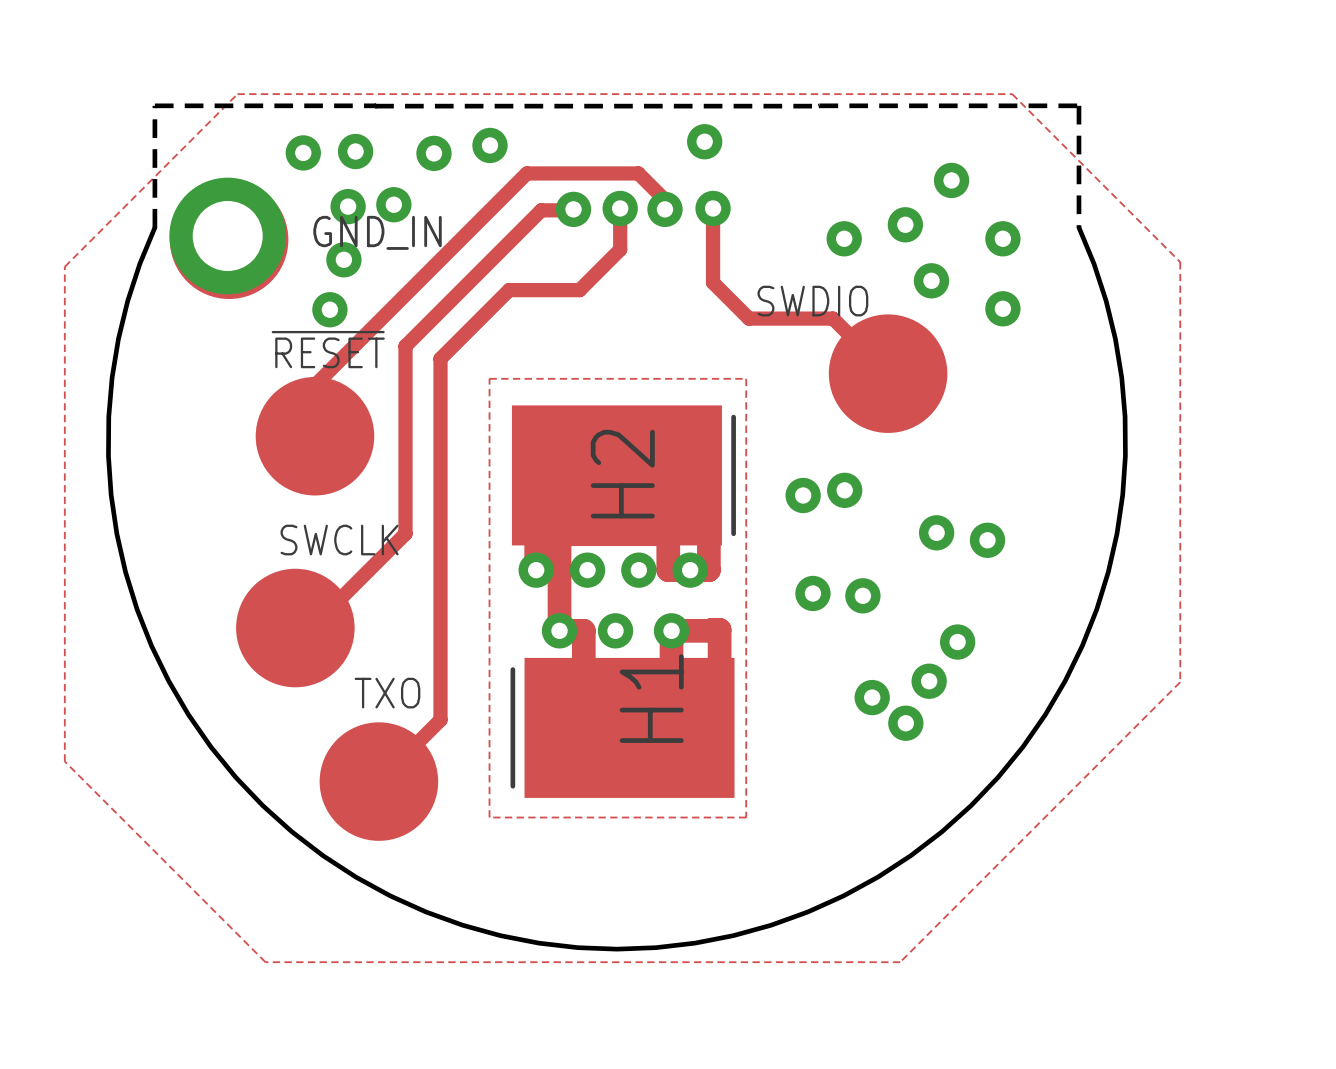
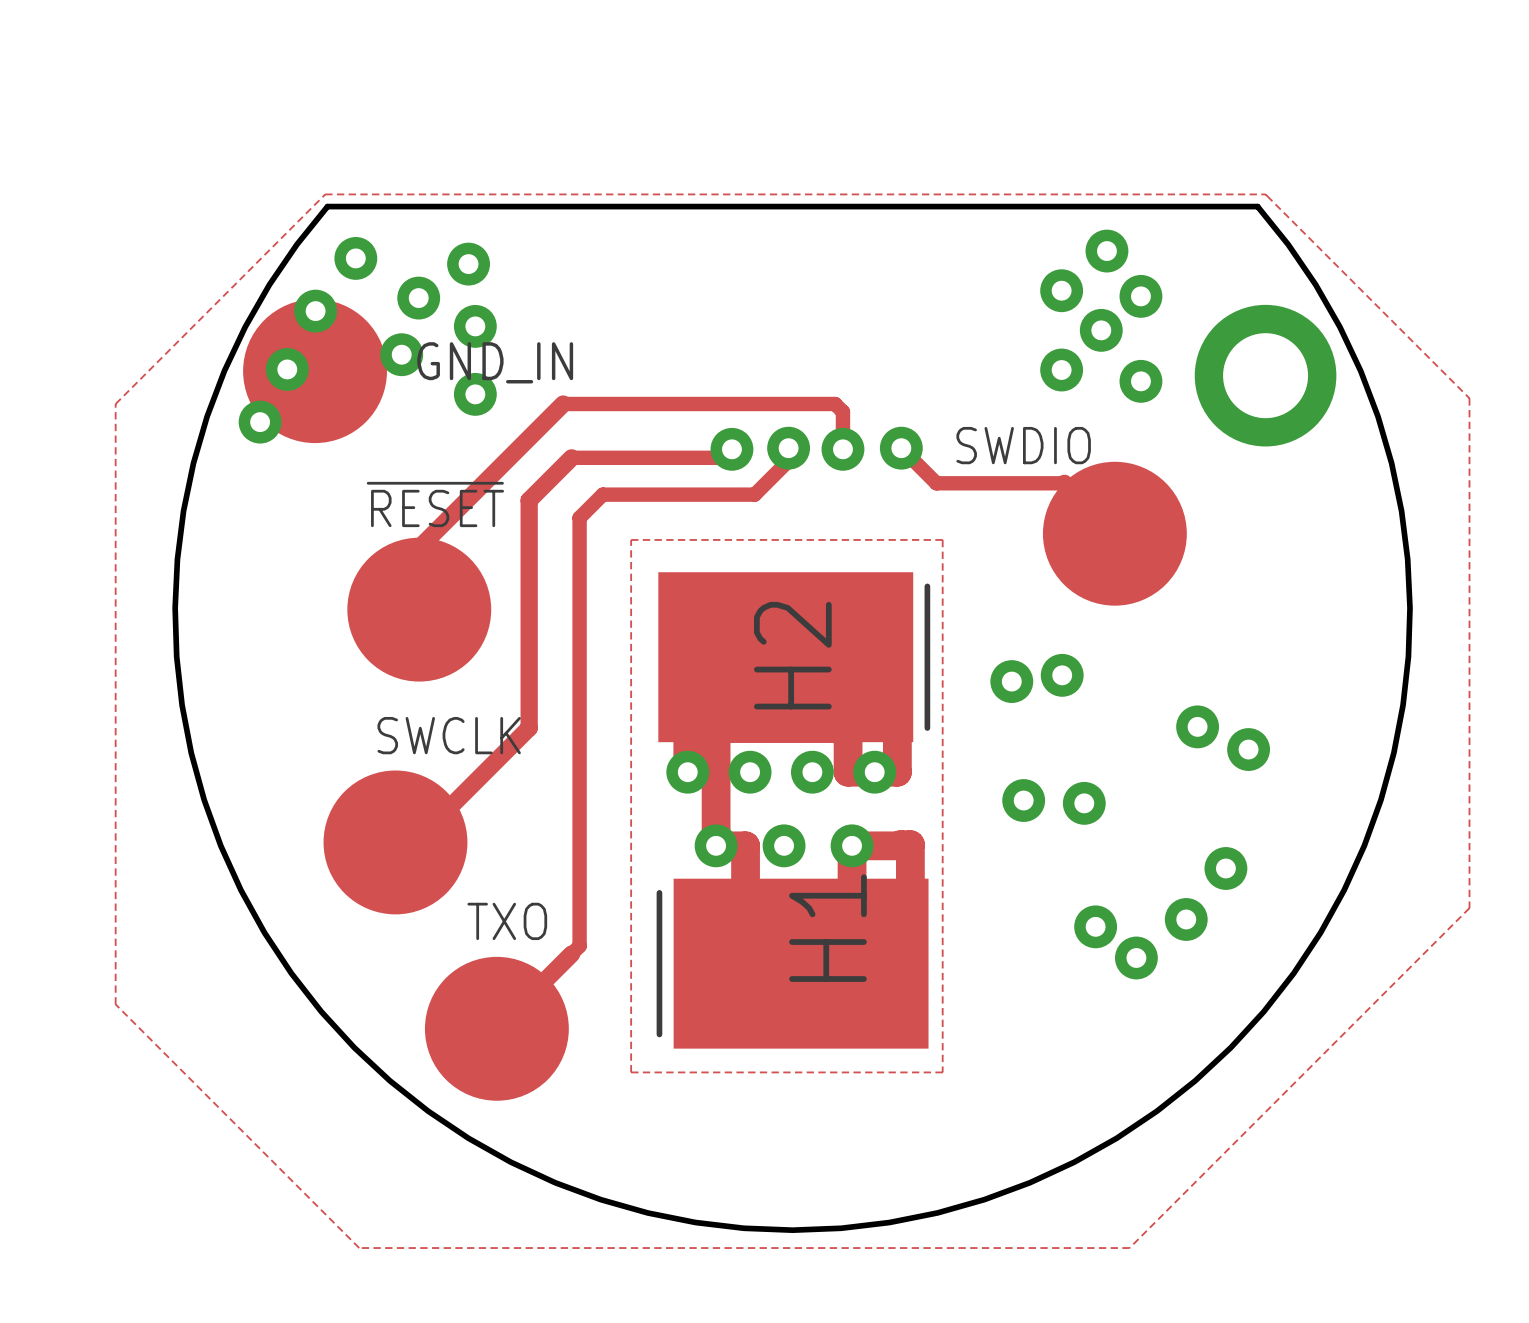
board edge: (154, 105) (1078, 105) (1078, 227) (1093, 263) (1106, 301) (1115, 339) (1121, 377) (1125, 416) (1125, 455) (1122, 494) (1117, 533) (1108, 571) (1096, 609) (1082, 645) (1065, 681) (1045, 714) (1022, 746) (998, 777) (971, 805) (941, 831) (910, 855) (878, 877) (843, 895) (808, 911) (771, 925) (733, 935) (694, 943) (656, 947) (616, 949) (577, 947) (538, 943) (500, 935) (462, 925) (425, 911) (390, 895) (355, 877) (322, 855) (291, 831) (262, 805) (235, 777) (210, 746) (188, 714) (168, 681) (151, 645) (137, 609) (125, 571) (116, 533) (111, 494) (108, 455) (108, 416) (112, 377) (118, 339) (127, 301) (139, 263) (154, 227) (154, 105) -> (327, 206) (296, 244) (269, 284) (245, 327) (224, 371) (207, 416) (193, 463) (183, 511) (177, 559) (175, 608) (176, 656) (182, 705) (191, 752) (204, 799) (220, 845) (240, 890) (264, 932) (291, 973) (321, 1011) (354, 1047) (389, 1080) (428, 1111) (468, 1138) (511, 1162) (555, 1182) (600, 1199) (647, 1212) (695, 1222) (743, 1228) (792, 1230) (841, 1228) (889, 1222) (937, 1212) (984, 1199) (1029, 1182) (1074, 1162) (1116, 1138) (1157, 1111) (1195, 1080) (1230, 1047) (1263, 1011) (1293, 973) (1320, 932) (1344, 890) (1364, 845) (1380, 799) (1393, 752) (1403, 705) (1408, 656) (1409, 608) (1407, 559) (1401, 511) (1391, 463) (1378, 416) (1360, 371) (1339, 327) (1315, 284) (1288, 244) (1257, 206) (327, 206)
via: none -> (1106, 251)
via: (704, 141) -> none
via: (489, 145) -> none
via: none -> (355, 258)
via position: (303, 152) -> (418, 298)
via: (433, 153) -> none
via: none -> (1061, 290)
via size: [169, 177, 287, 295] -> [265, 348, 309, 391]
via: none -> (1140, 296)
via: (951, 180) -> none
via: none -> (315, 311)
via: (393, 204) -> none
via position: (348, 206) -> (475, 326)
via: none -> (1101, 330)
track: (620, 208) (620, 249) (579, 290) (509, 290) (440, 358) (440, 719) -> (788, 448) (788, 460) (754, 494) (602, 494) (579, 517) (579, 946) (571, 954)
via: (620, 208) -> none
track: (713, 208) (713, 282) (749, 318) (833, 318) (846, 332) -> (901, 448) (936, 483) (1064, 483)
via: (713, 208) -> none
track: (573, 209) (541, 210) (440, 311) -> (731, 449) (723, 457) (571, 457)
via: (573, 209) -> none
track: (664, 209) (664, 200) (638, 173) (526, 173) (433, 266) -> (842, 449) (842, 411) (835, 404) (563, 404)
via: (664, 209) -> none
via size: [985, 221, 1021, 257] -> [1194, 304, 1337, 447]
via: (905, 224) -> none
via: none -> (401, 354)
via: none -> (1140, 381)
via position: (343, 259) -> (475, 394)
via: (931, 280) -> none
via: none -> (260, 422)
via: none -> (788, 448)
via: none -> (901, 448)
via: none -> (731, 449)
via: none -> (842, 449)
via: (1002, 308) -> none
via: (329, 309) -> none
via position: (936, 532) -> (1197, 726)
via position: (987, 540) -> (1248, 749)
via position: (957, 642) -> (1225, 868)
via position: (929, 681) -> (1186, 919)

